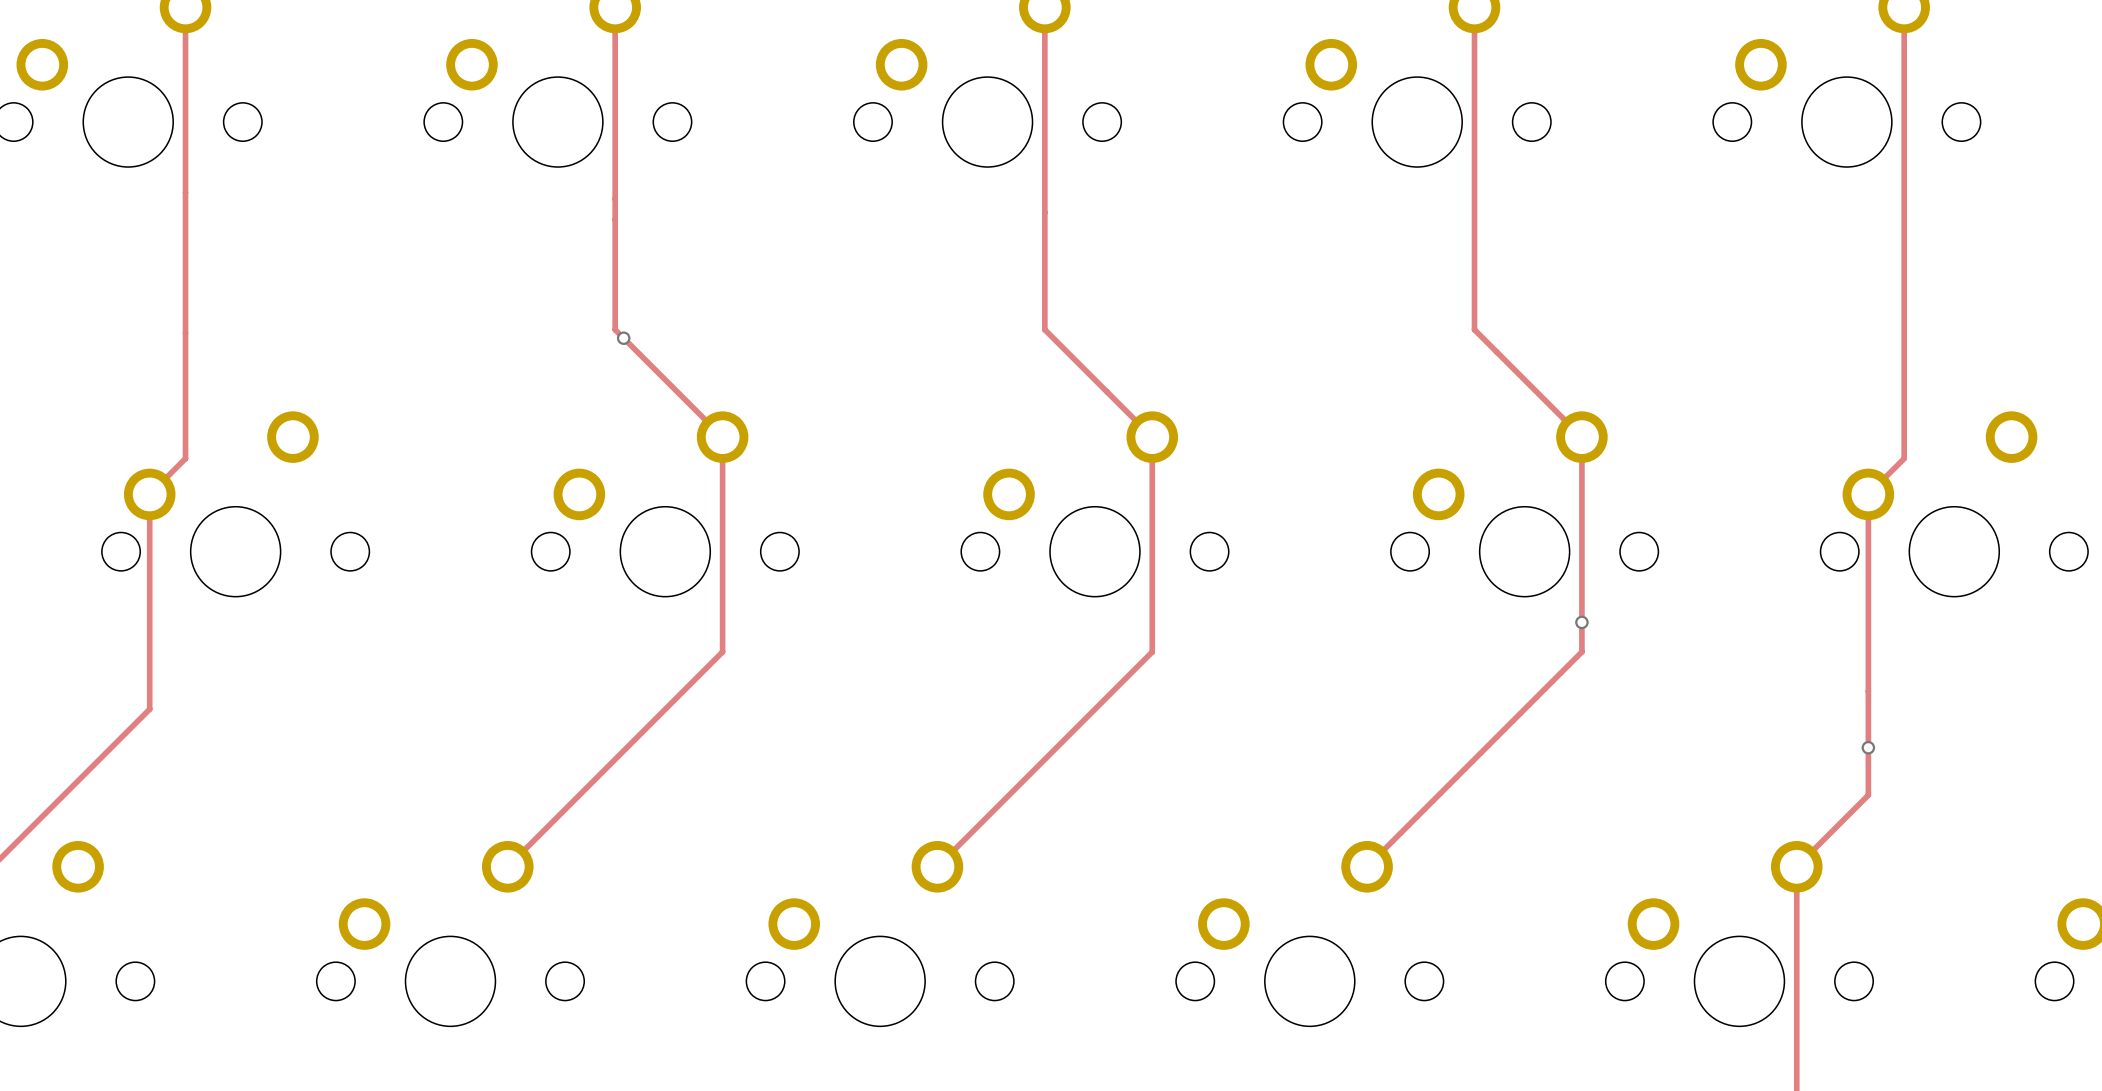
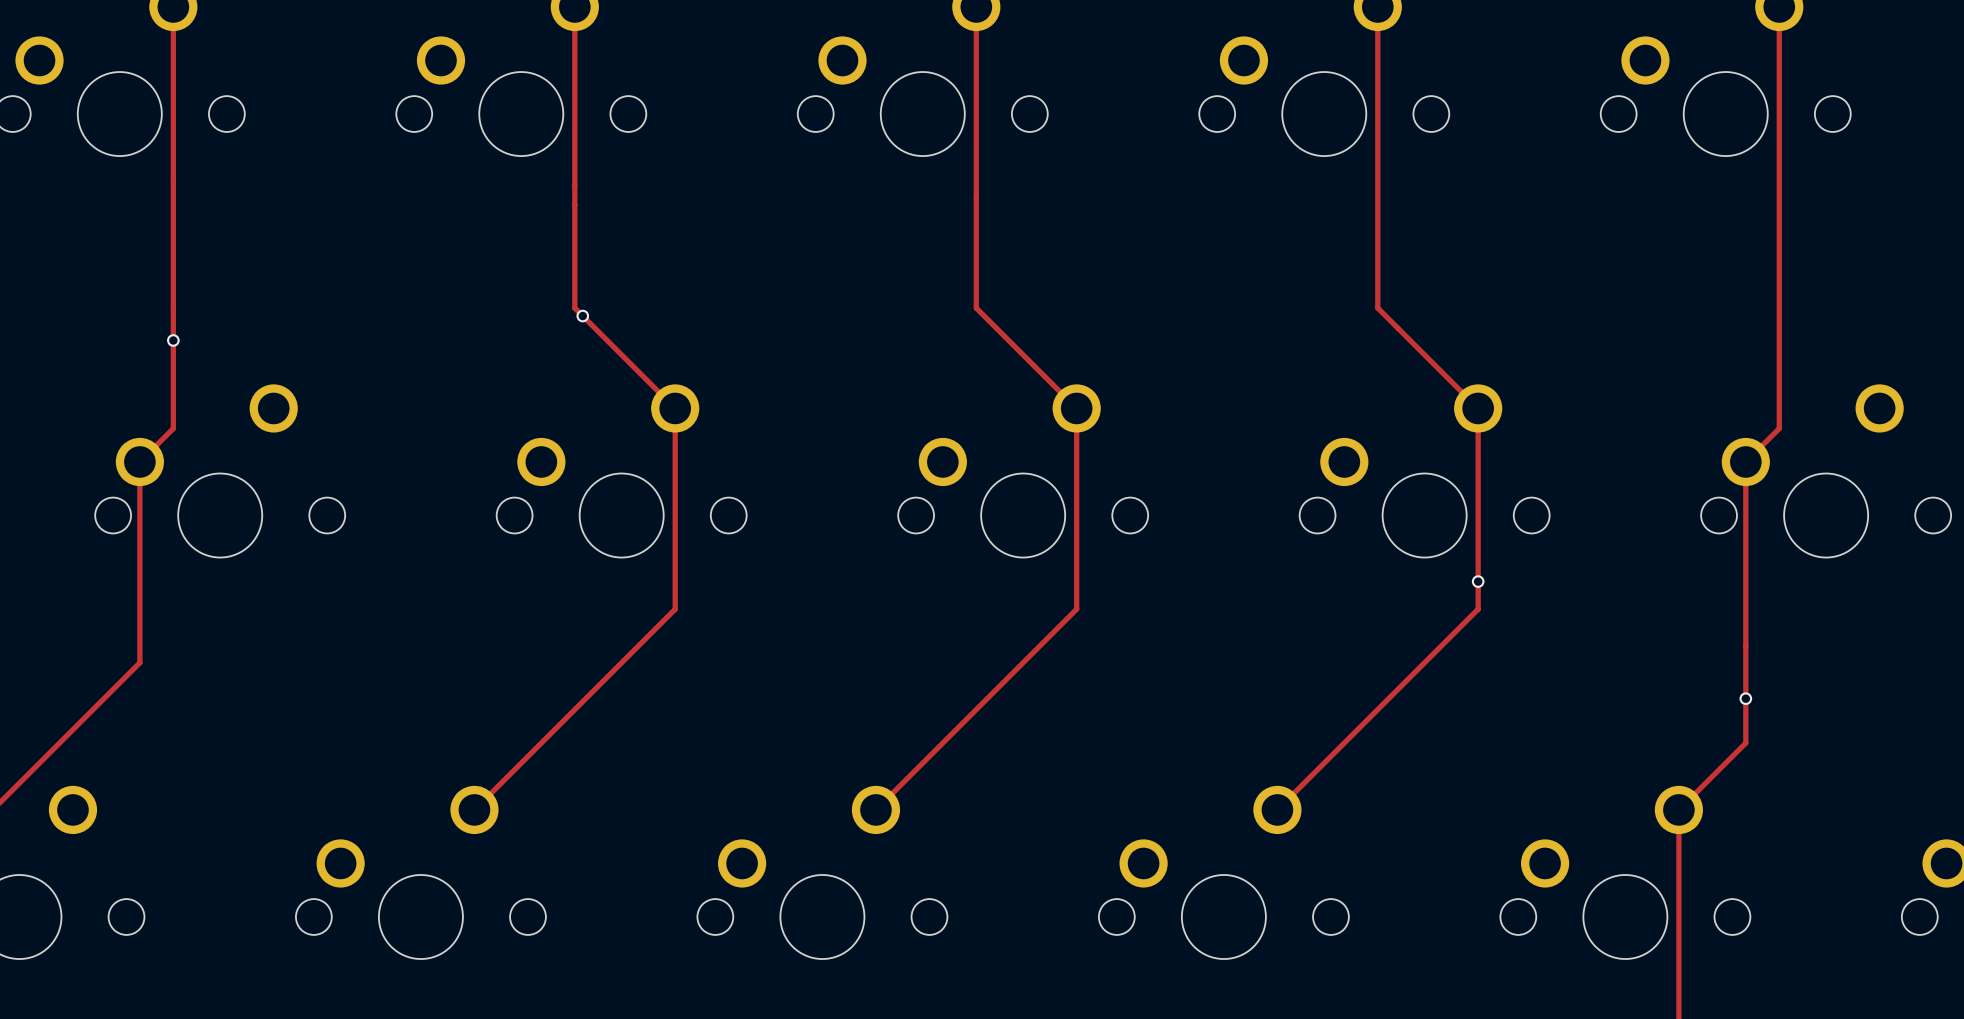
via: none -> (173, 340)

